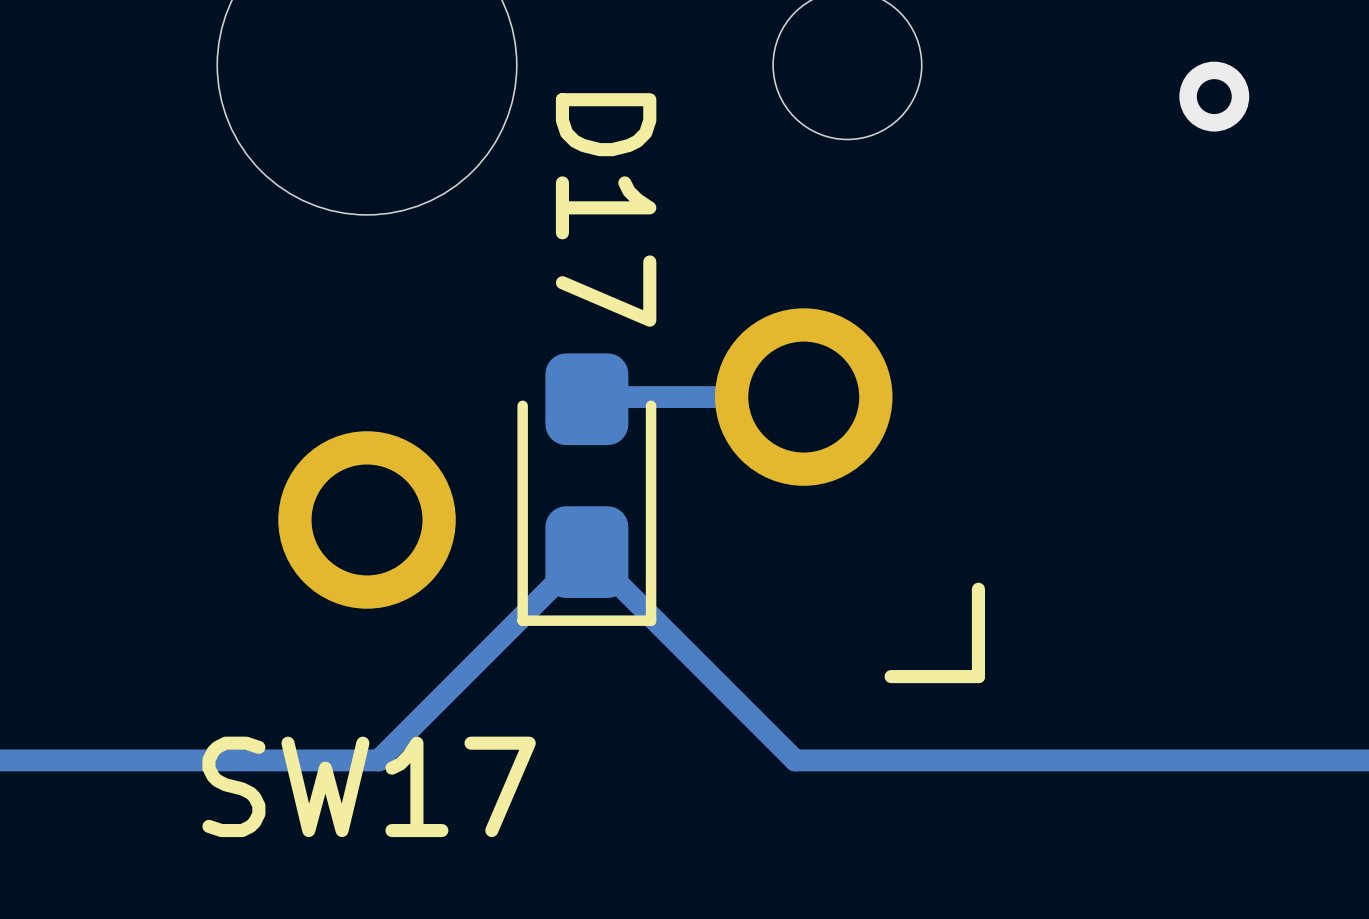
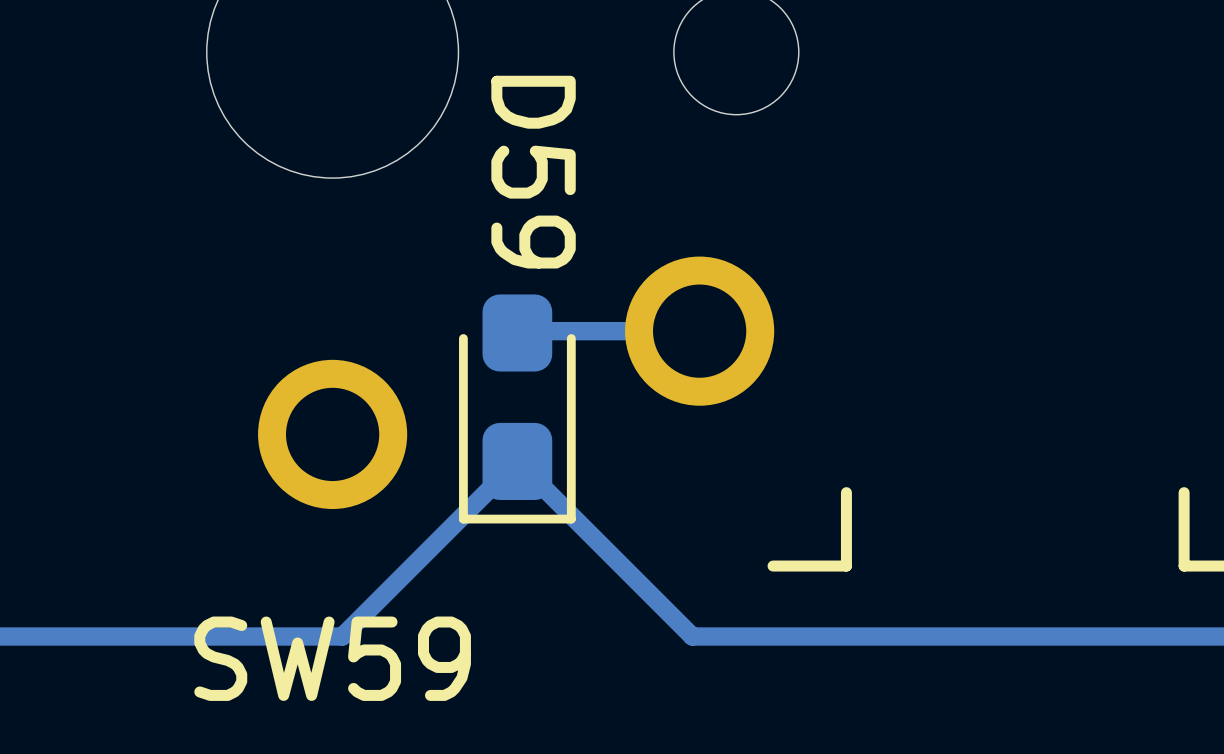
via: (1214, 96) -> none
D17 name: D17 (606, 209) -> D59 (533, 172)
SW17 name: SW17 (369, 786) -> SW59 (332, 658)

